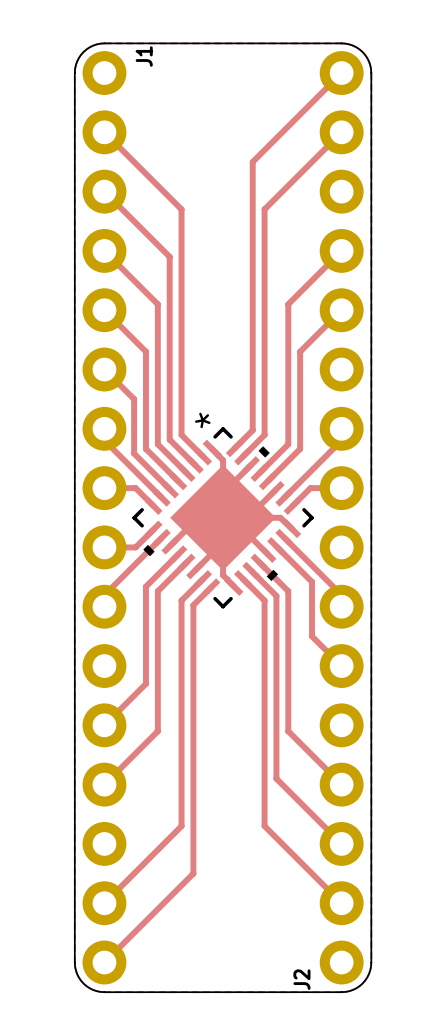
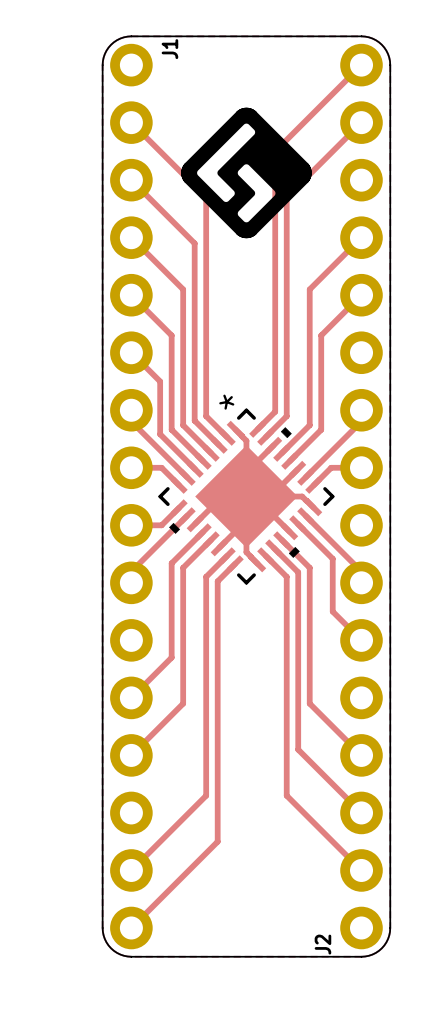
drawing: none -> [181, 107, 312, 239]

